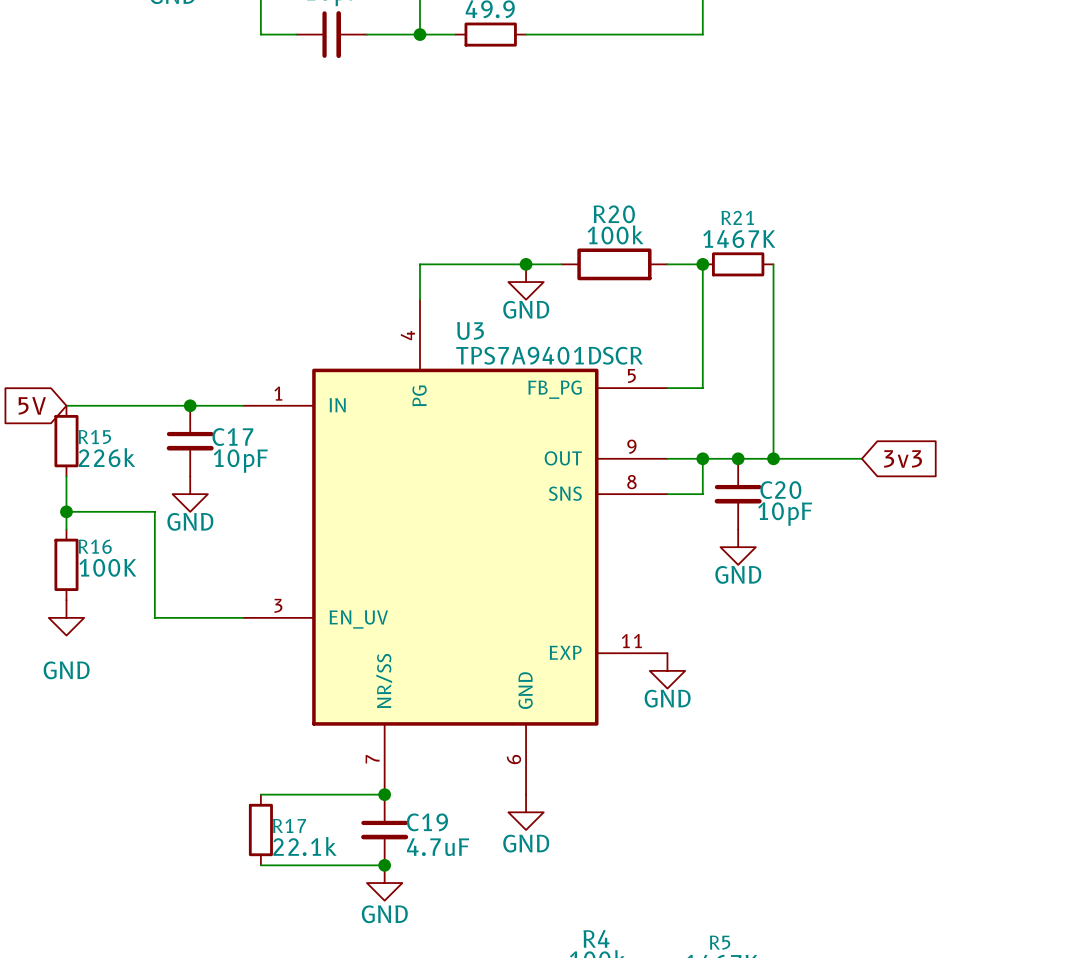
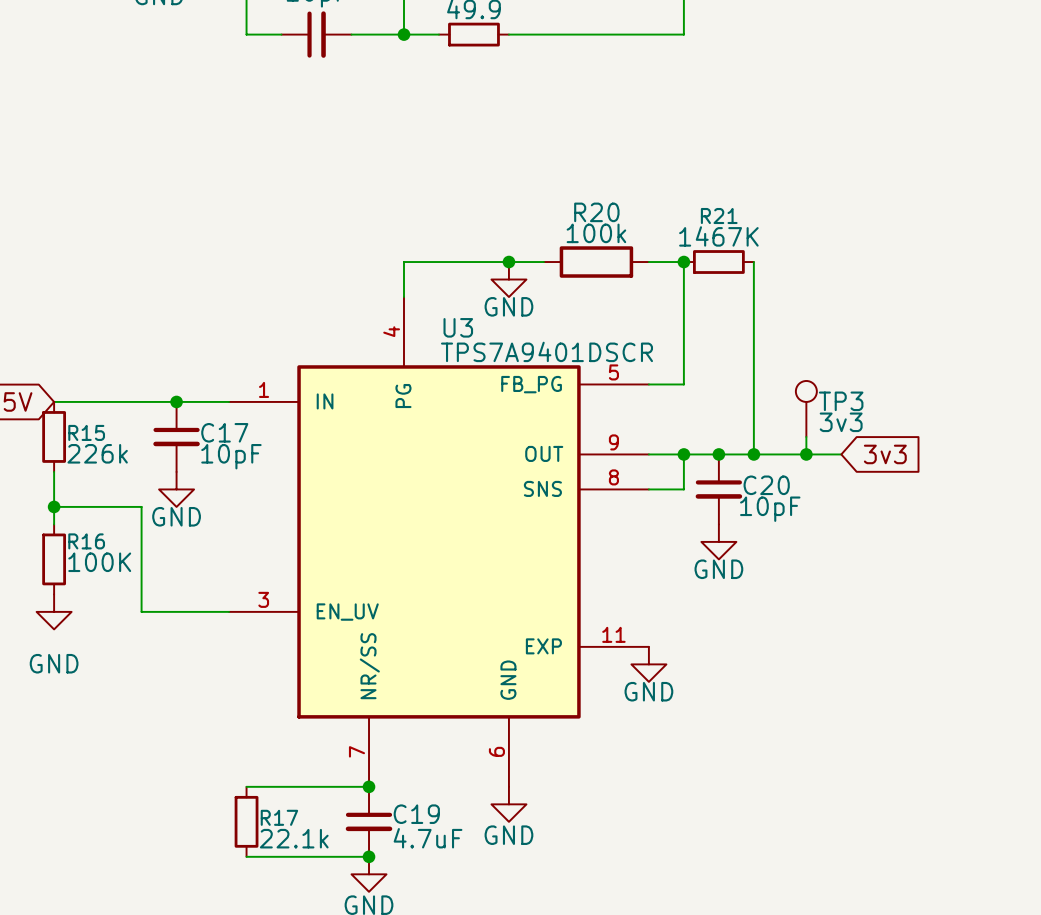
TP3: none -> 3v3 (806, 408)
wire: none -> (806, 436) (806, 454)
junction: none -> (806, 454)

